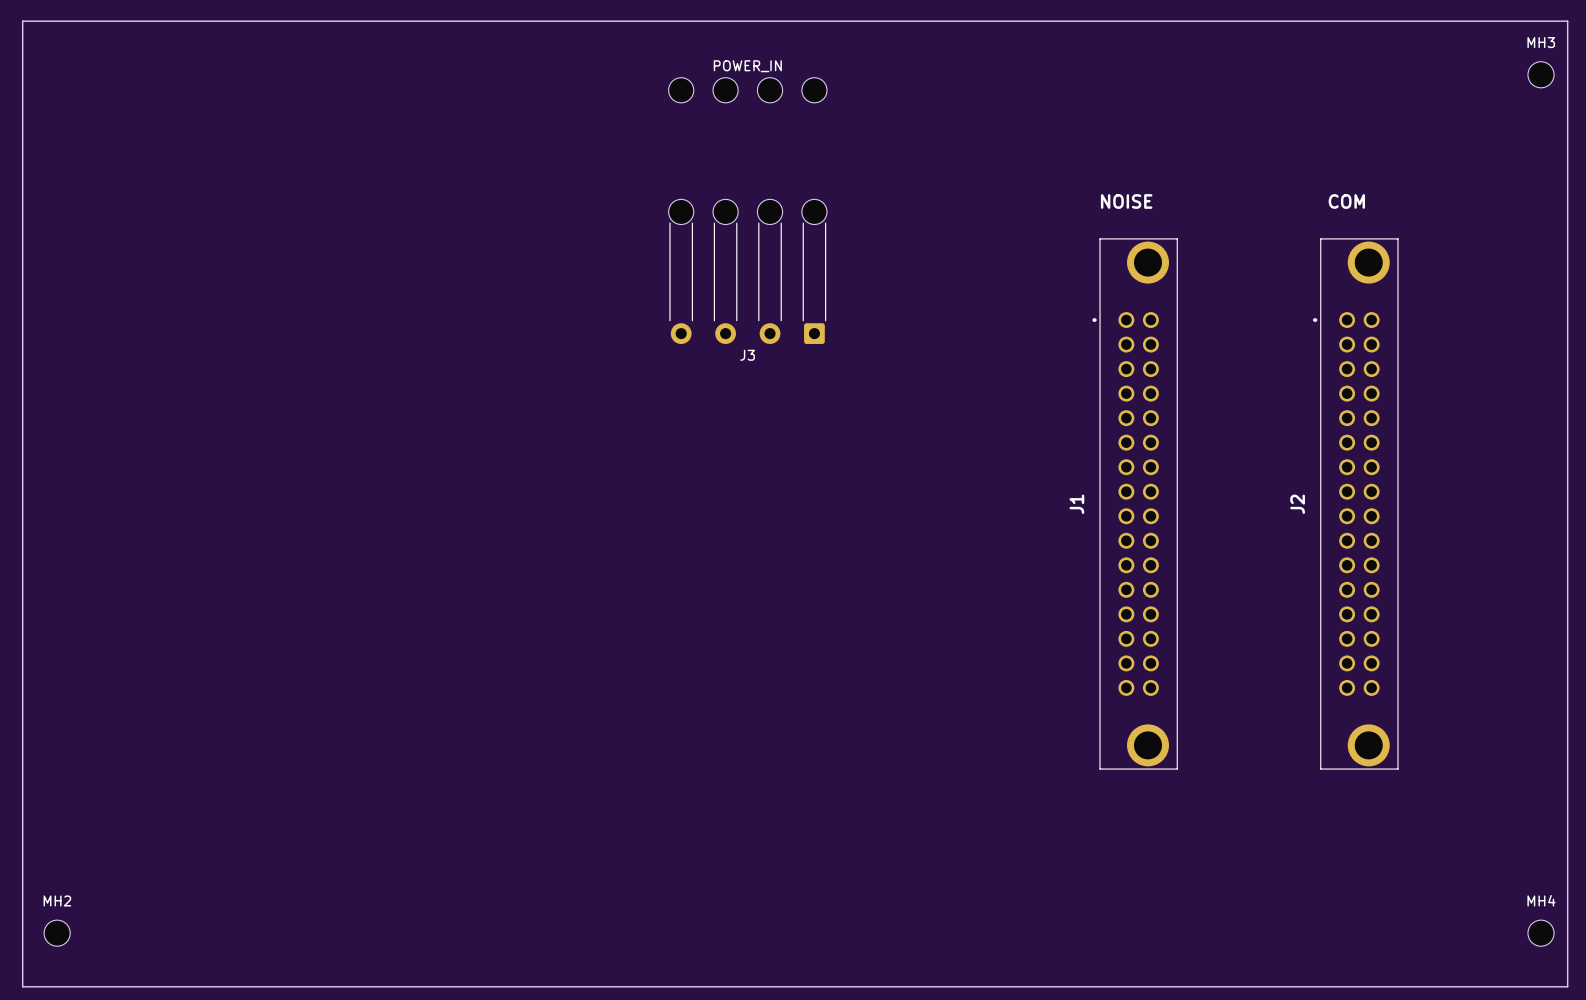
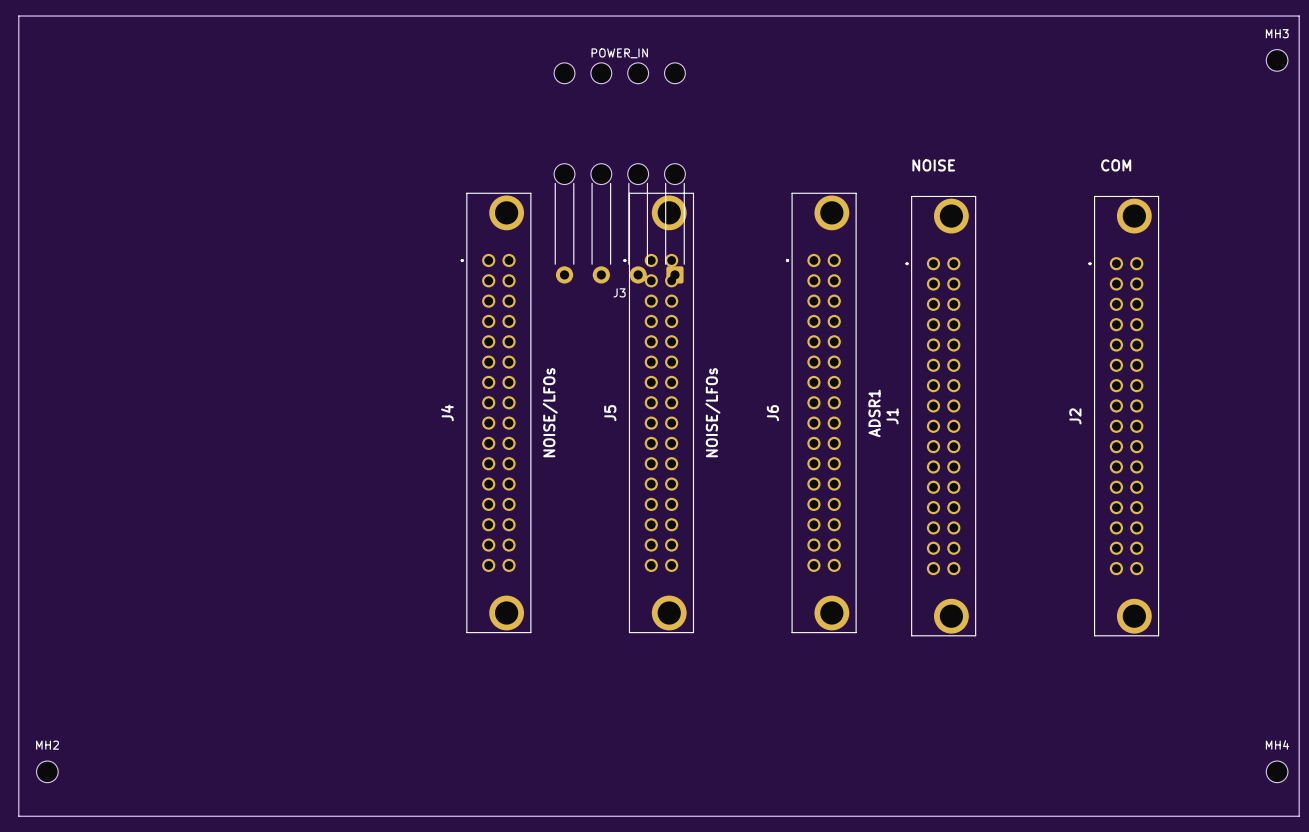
J4: none -> NOISE/LFOs (495, 412)
J5: none -> NOISE/LFOs (658, 412)
J6: none -> ADSR1 (821, 412)

